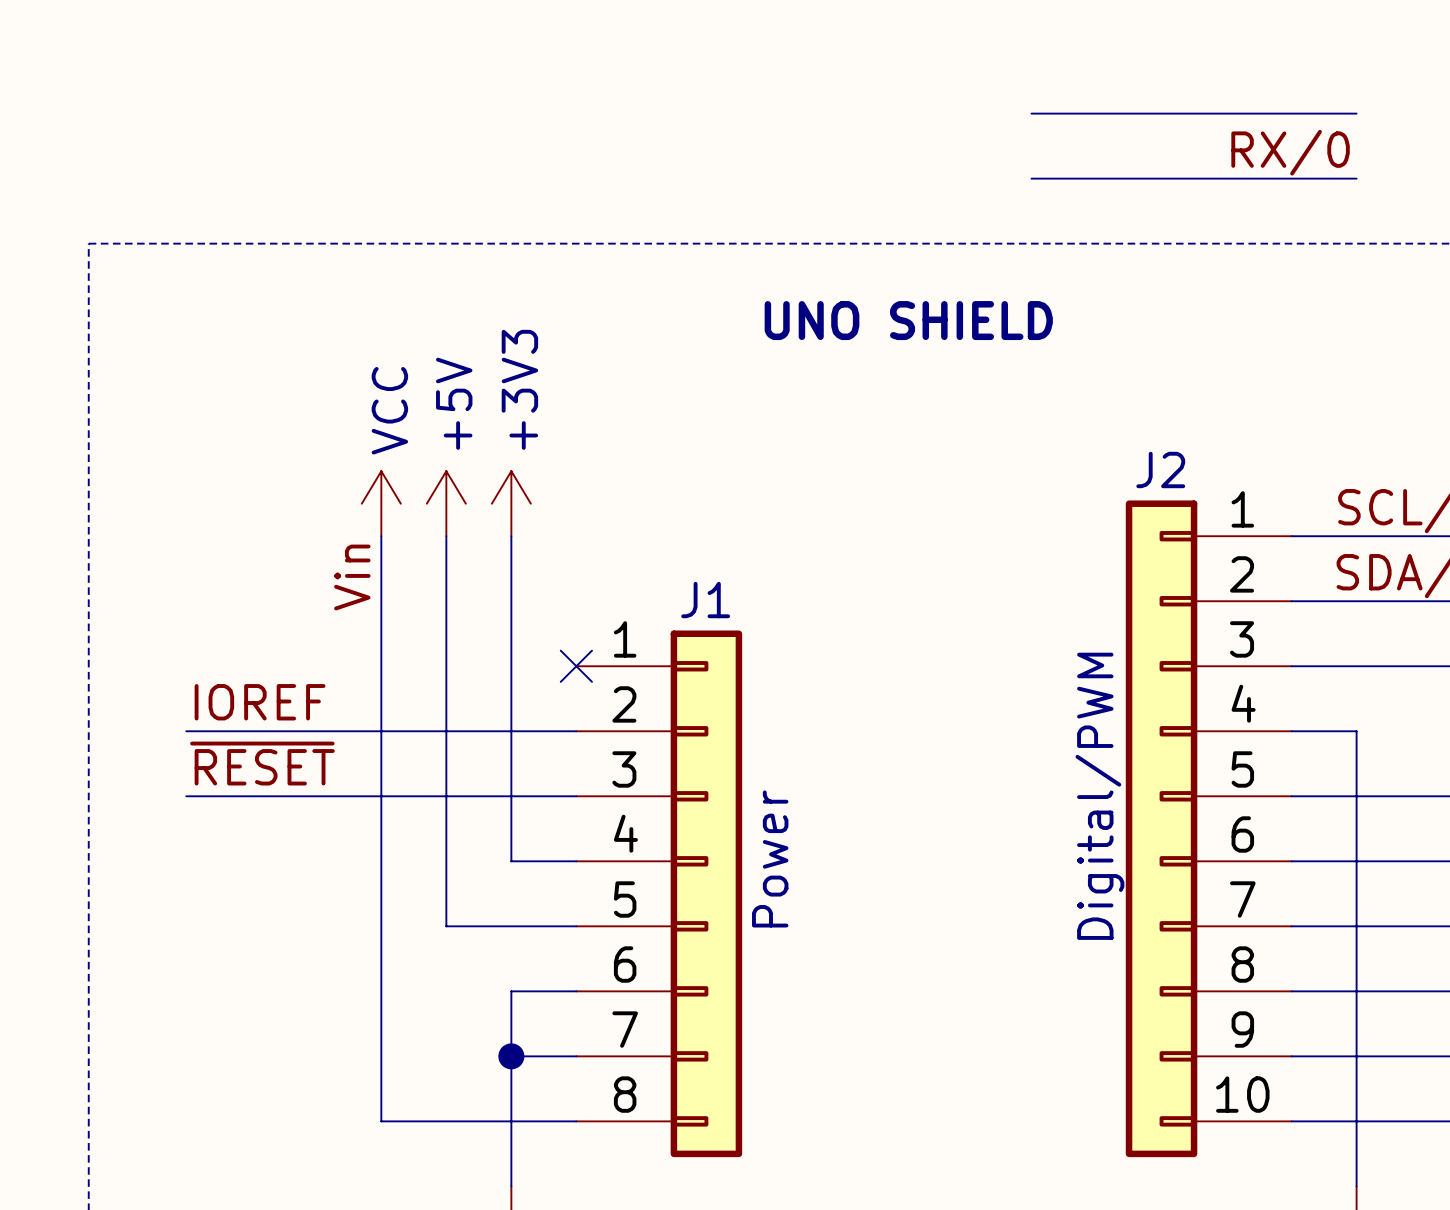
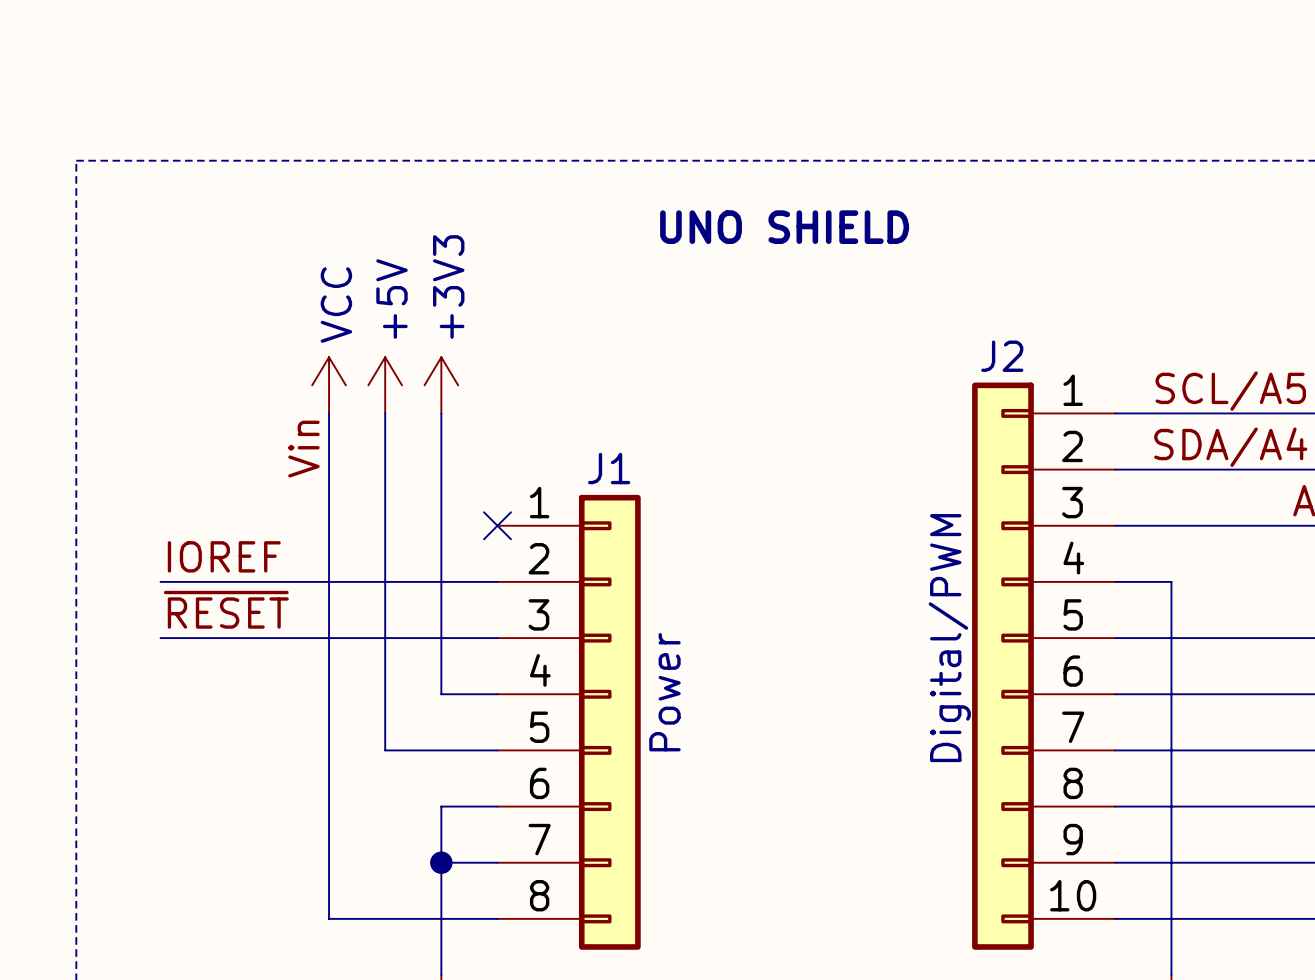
wire: (1031, 113) (1356, 113) -> none
label: RX/0 (1290, 152) -> none
wire: (1031, 178) (1356, 178) -> none

